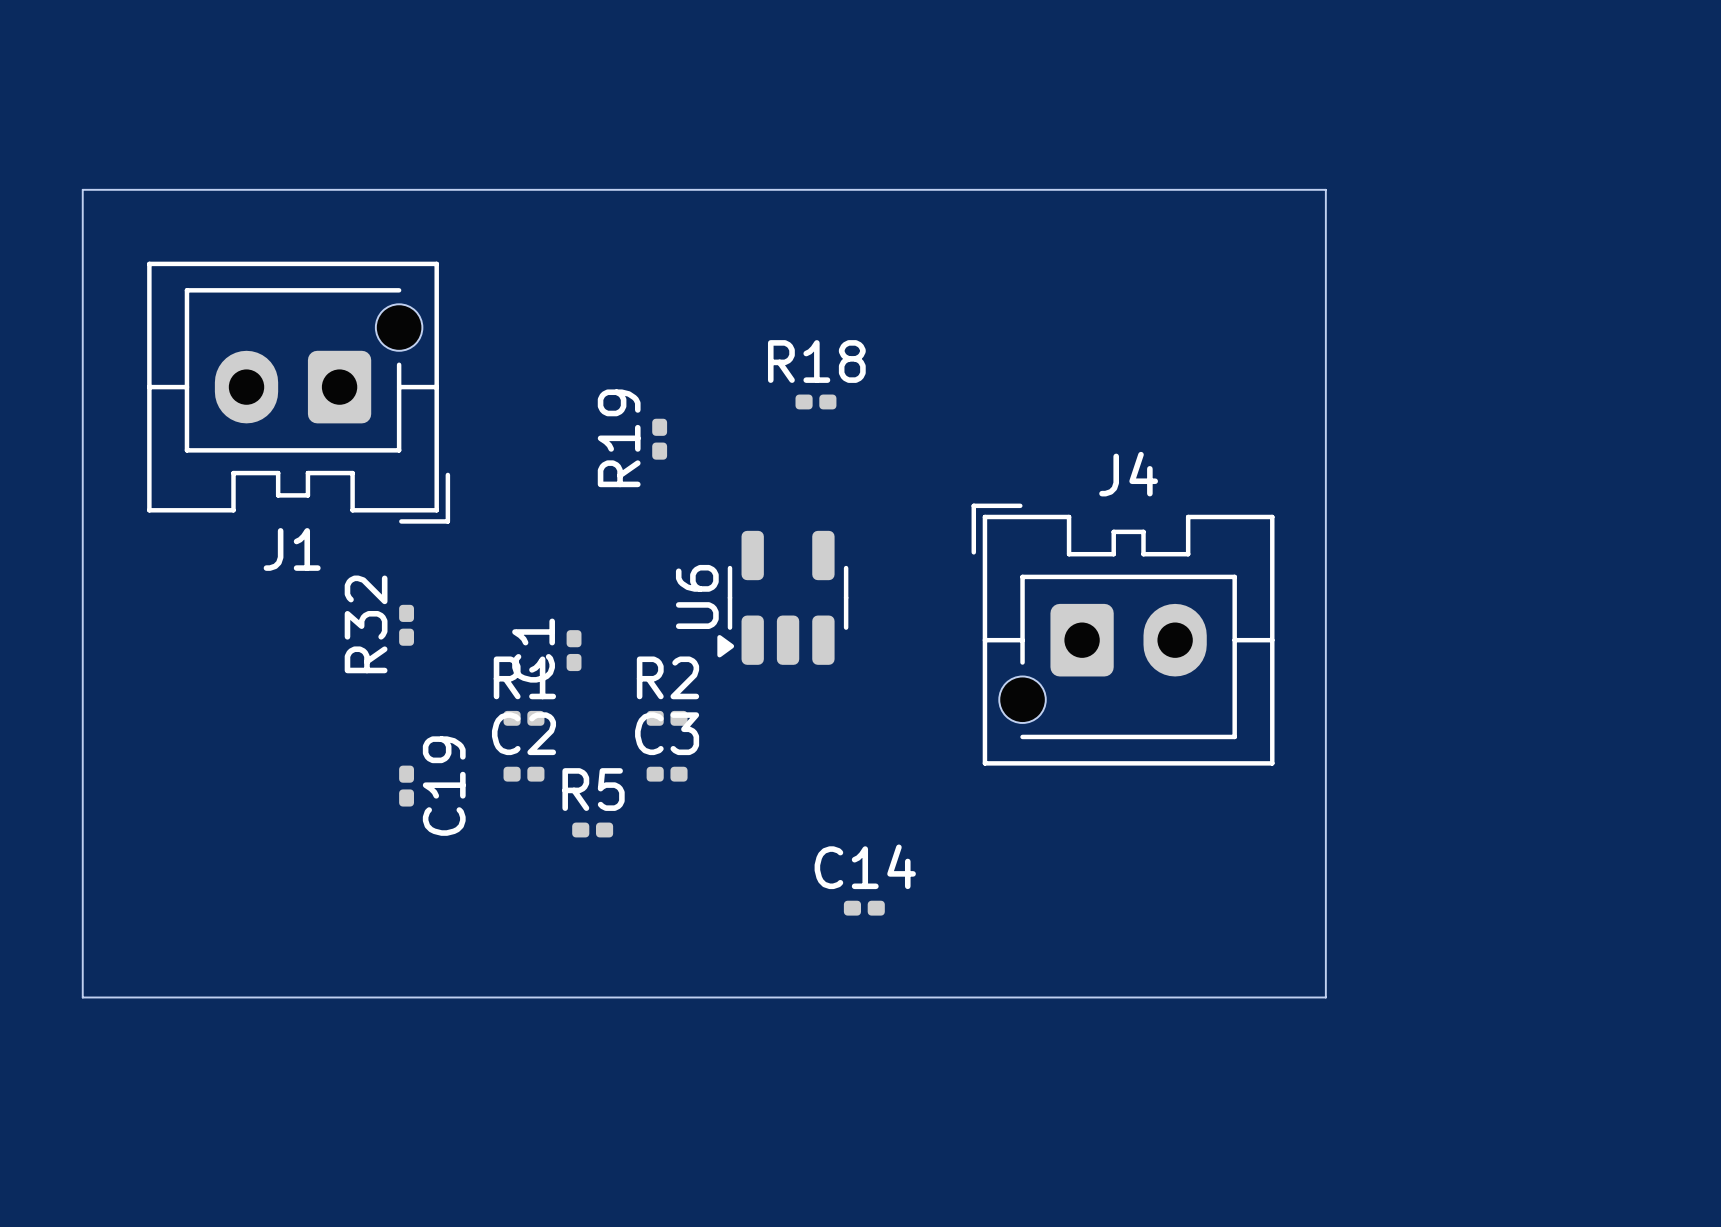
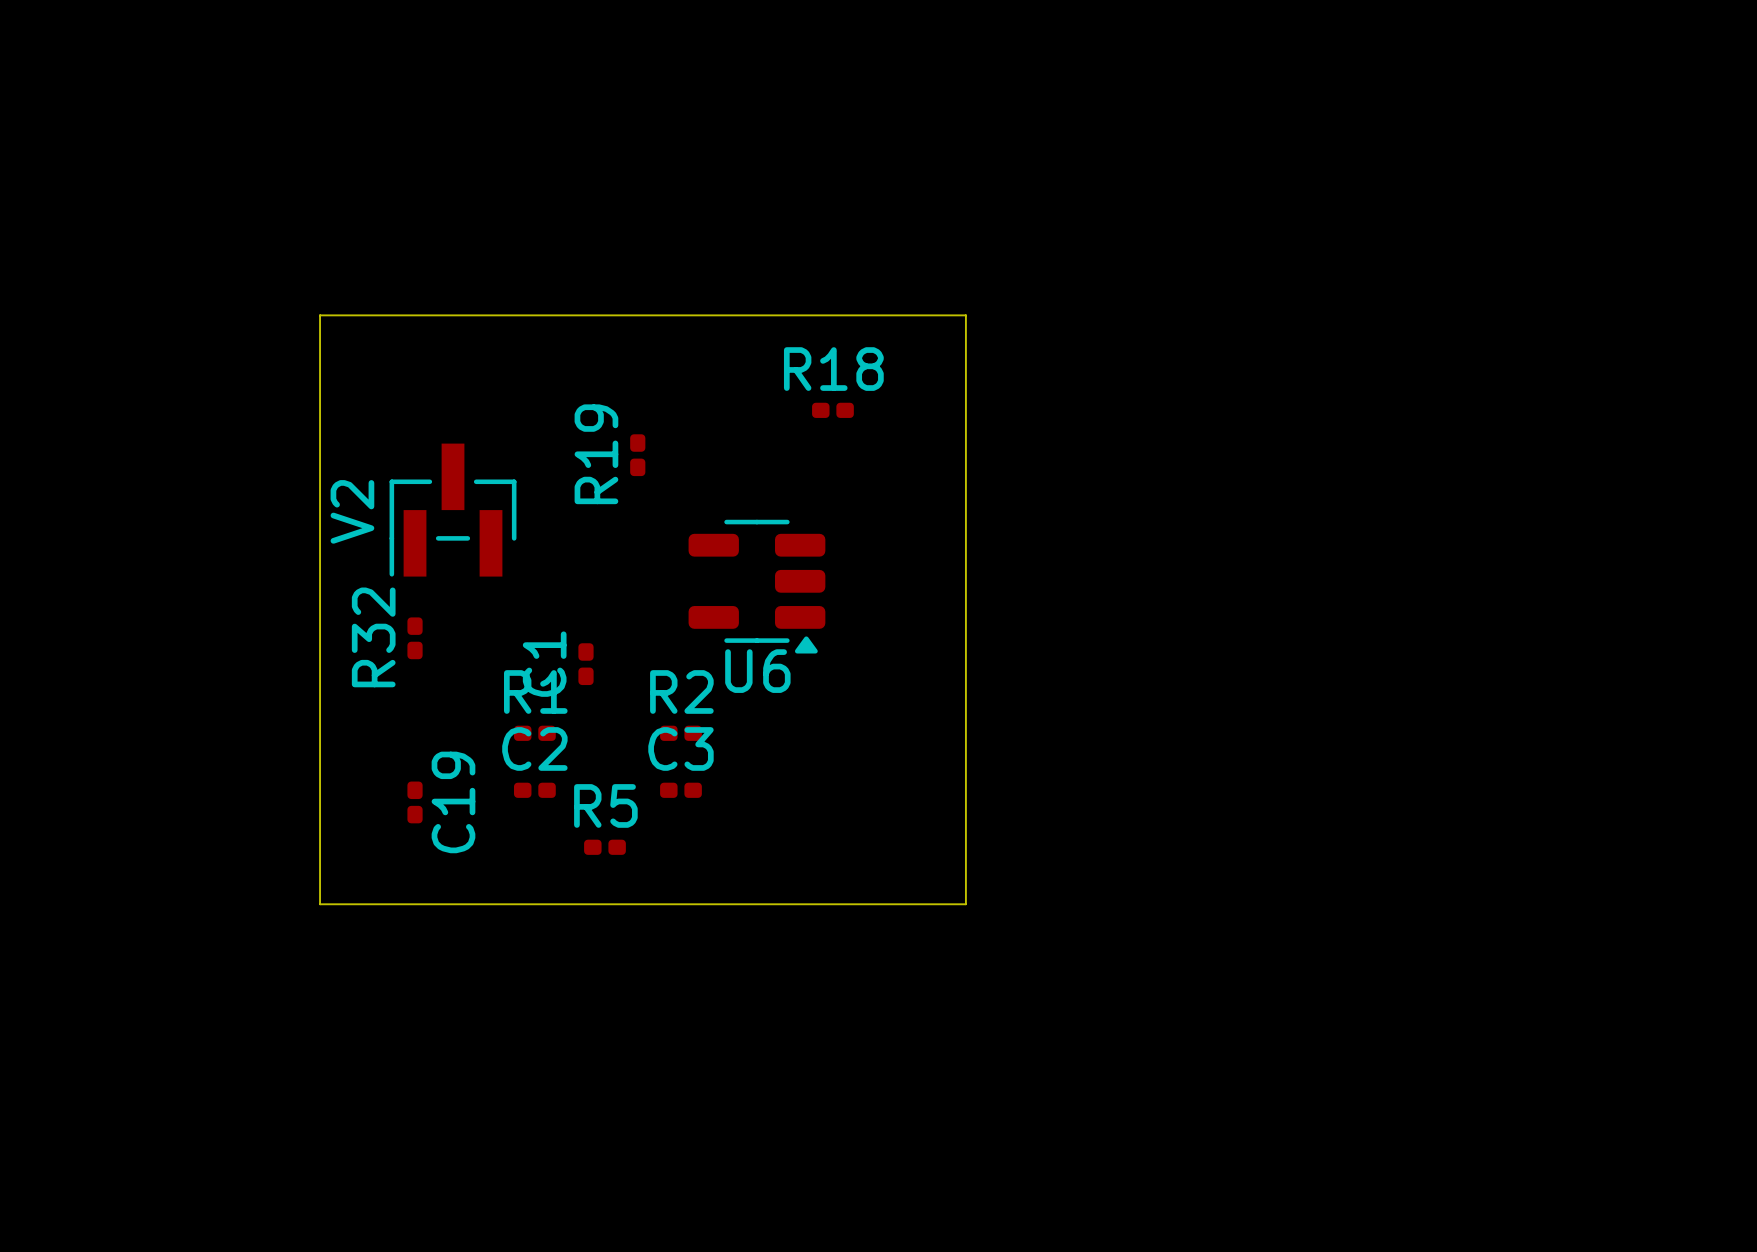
board edge: (82, 189) (1325, 189) (1325, 997) (82, 997) (82, 189) -> none
board edge: none -> (320, 315) (965, 315) (965, 904) (320, 904) (320, 315)
J1: (298, 392) -> none
R19 position: (659, 439) -> (637, 455)
V2: none -> (453, 510)
U6 rotation: 0° (782, 597) -> 90° counterclockwise (756, 586)
J4: (1123, 634) -> none
C14: (864, 908) -> none

